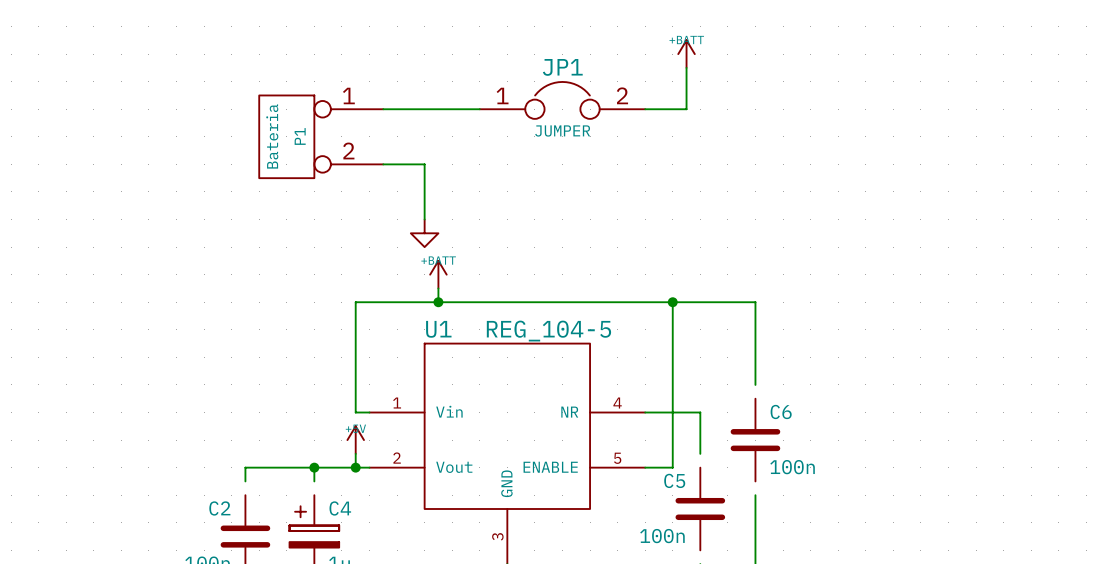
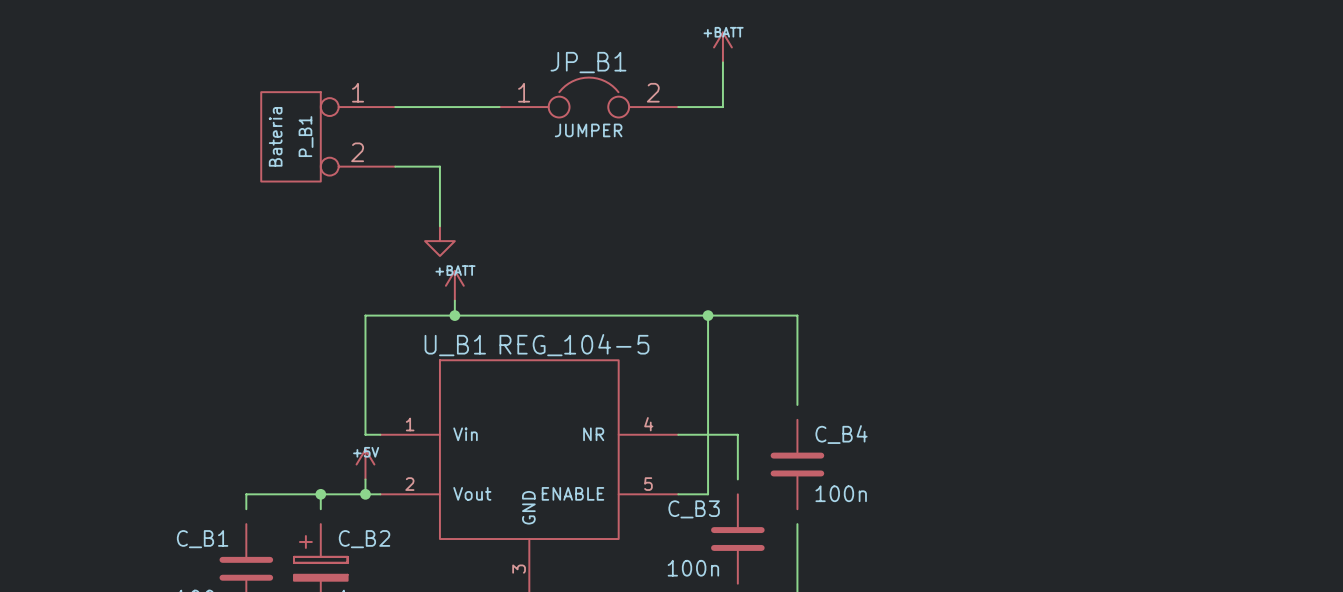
JP1 name: JP1 (562, 67) -> JP_B1 (588, 62)
P1 name: P1 (300, 136) -> P_B1 (306, 136)
U1 name: U1 (438, 329) -> U_B1 (455, 345)
C6 name: C6 (781, 411) -> C_B4 (841, 434)
C5 name: C5 (674, 480) -> C_B3 (694, 509)
C2 name: C2 (219, 508) -> C_B1 (202, 539)
C4 name: C4 (340, 508) -> C_B2 (364, 539)

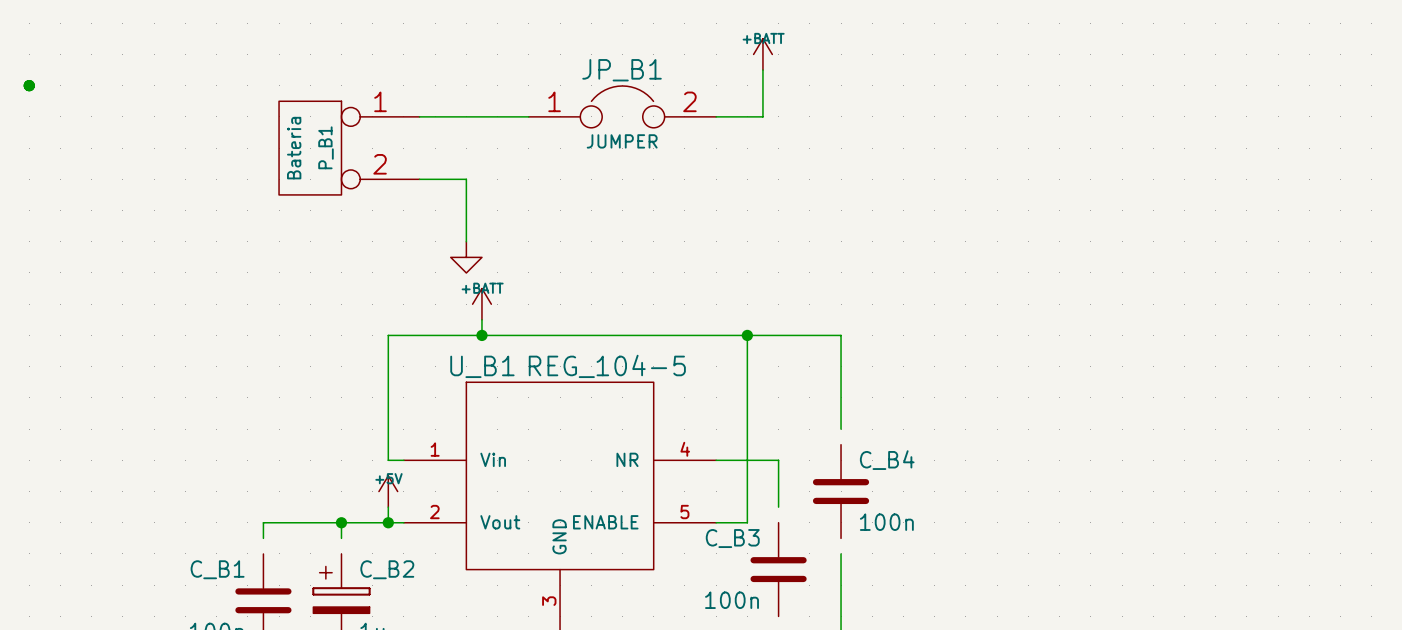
junction: none -> (29, 85)

